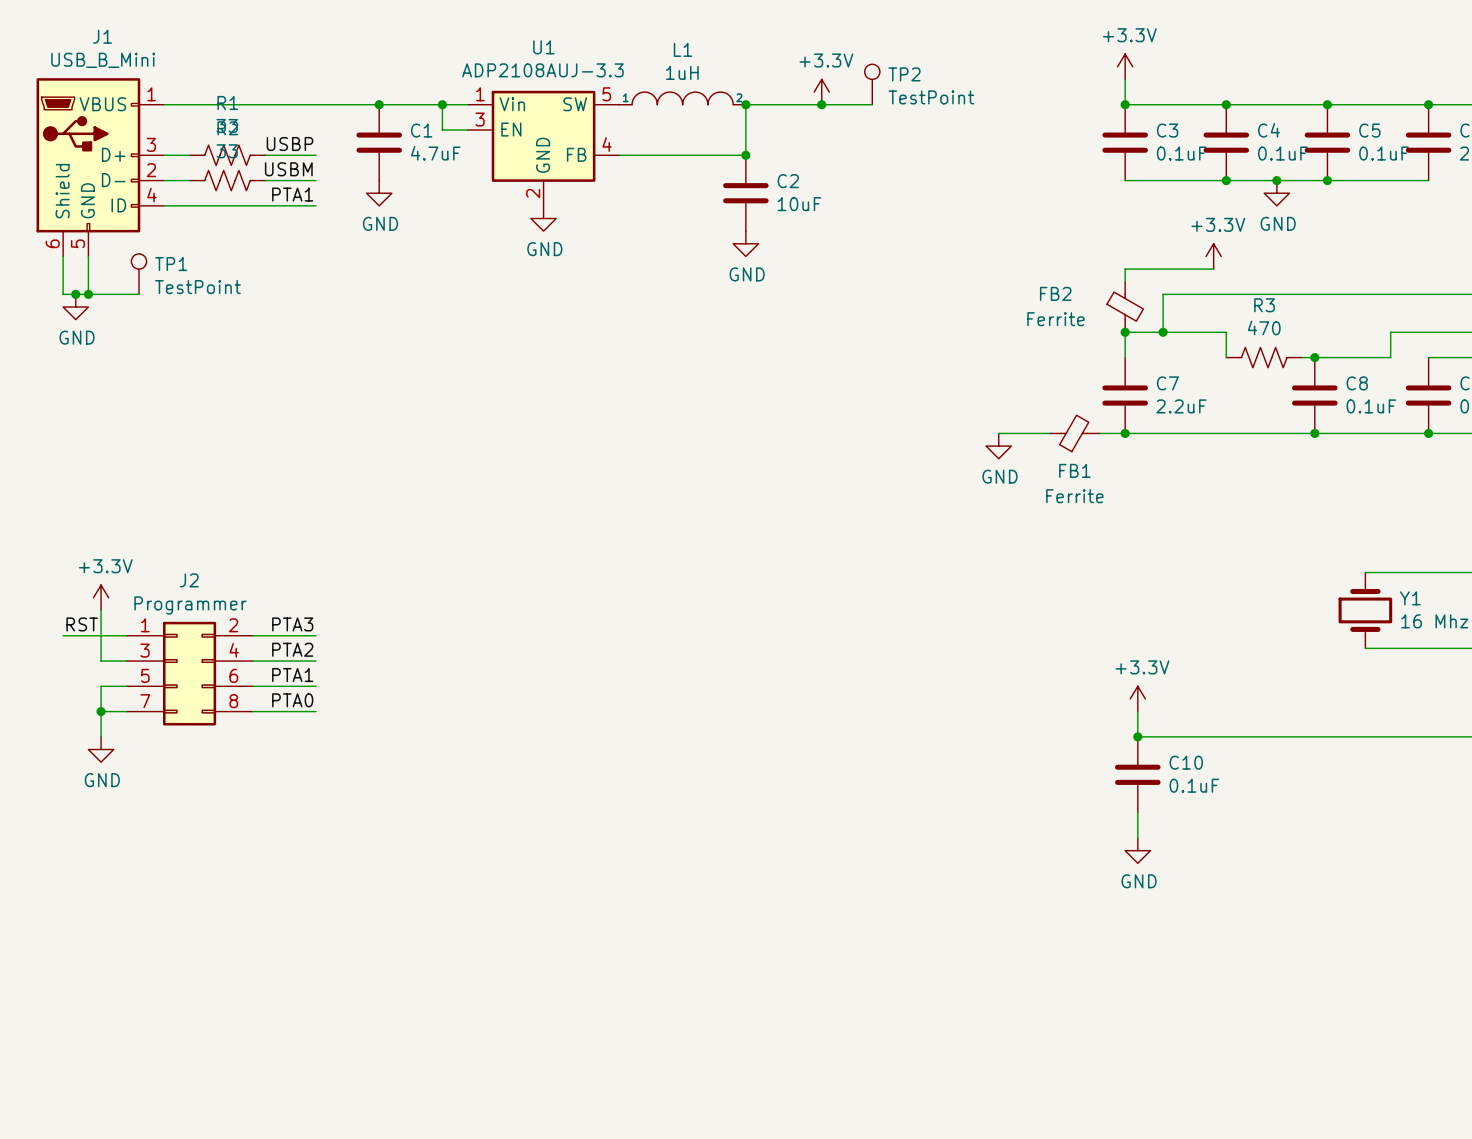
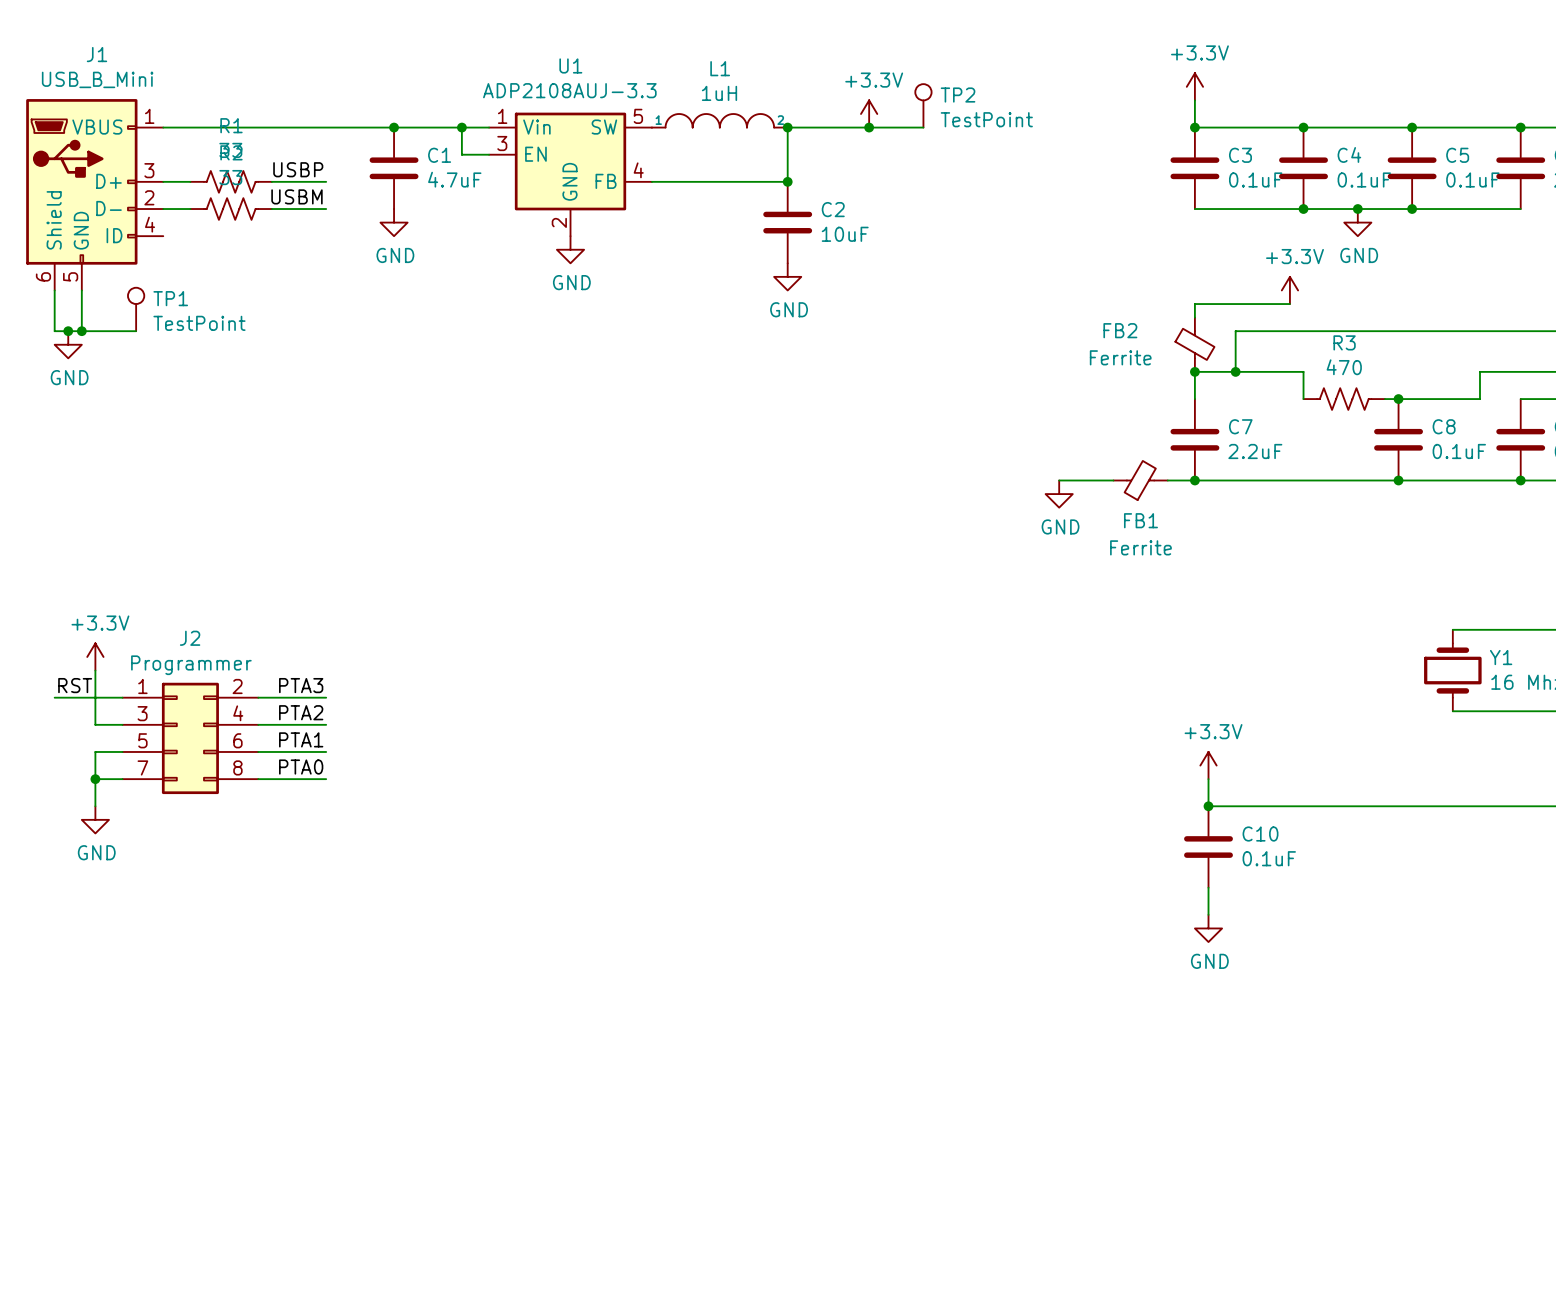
label: PTA1 (292, 194) -> none
wire: (164, 205) (315, 205) -> none

